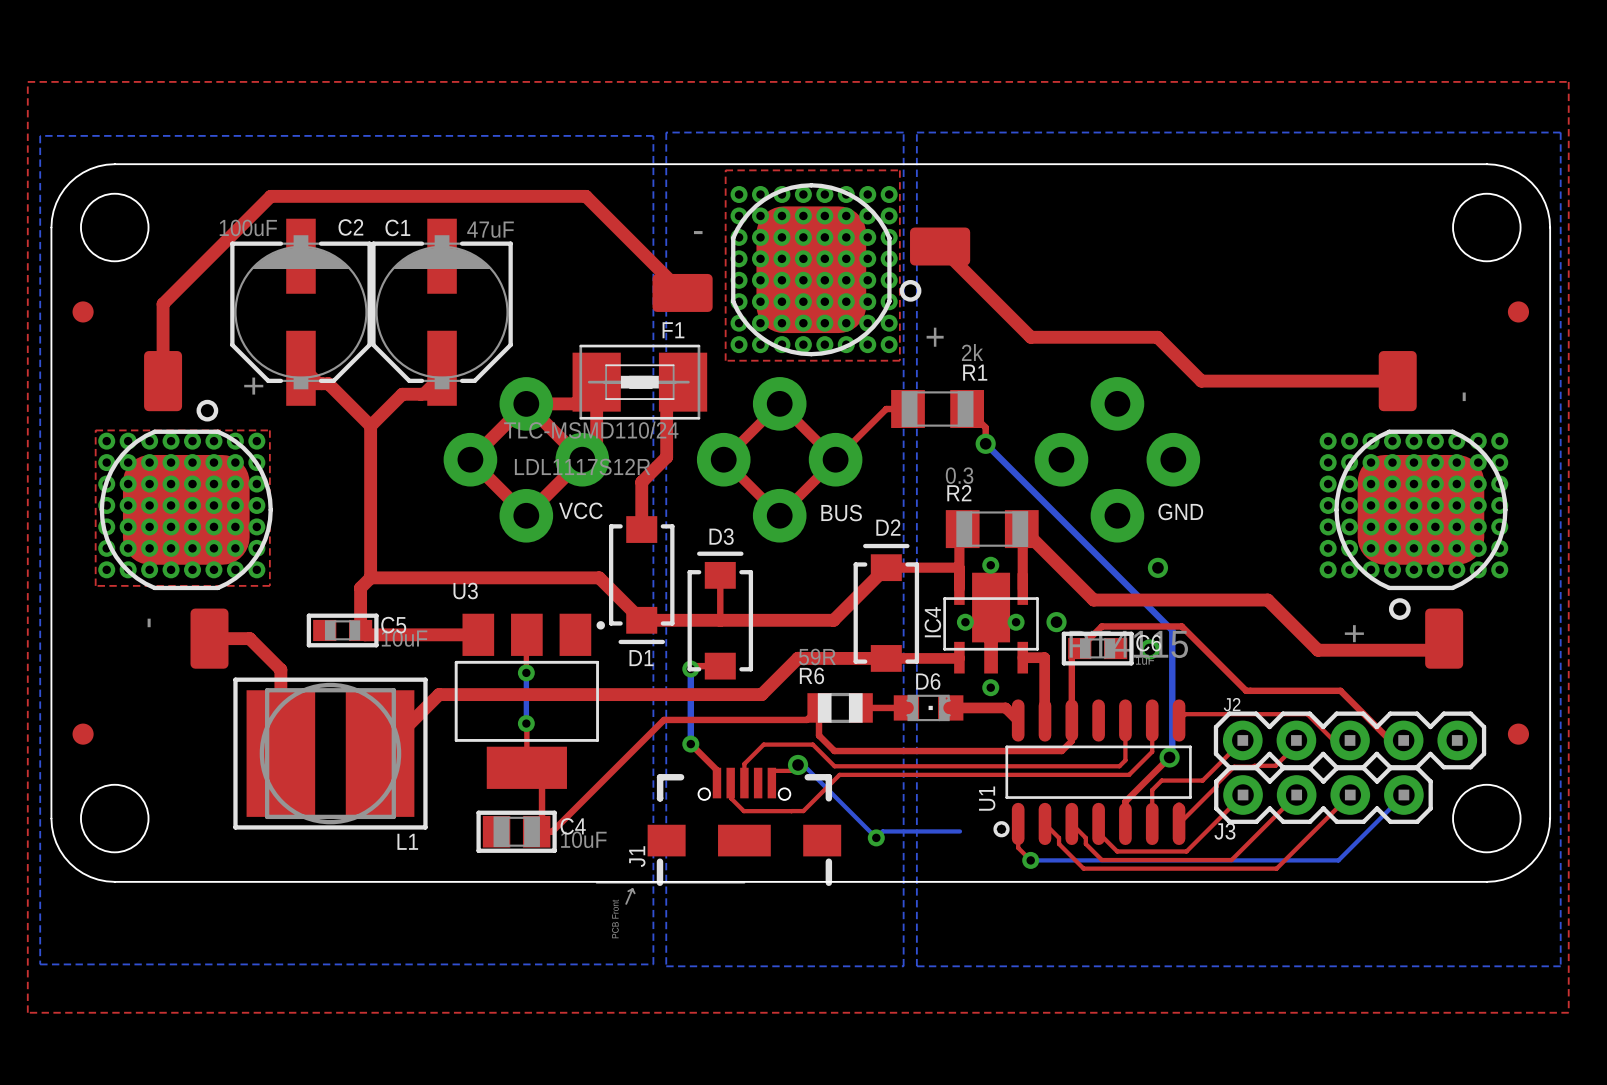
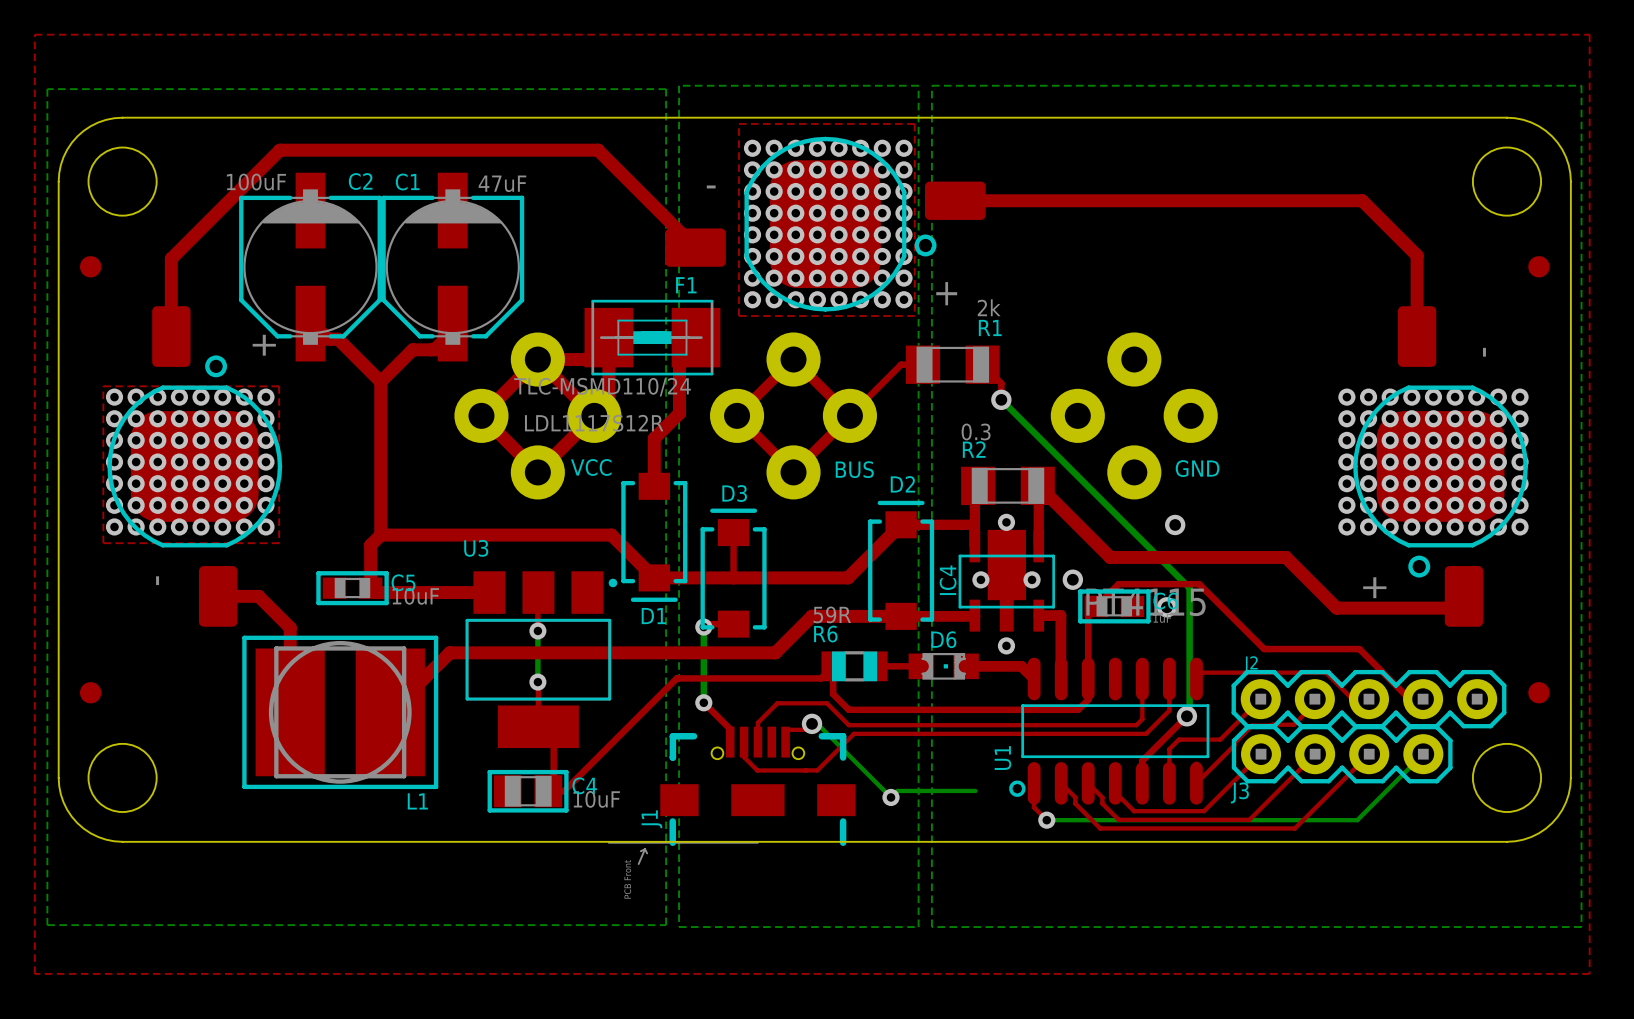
top track: (940, 246) (1030, 337) (1157, 337) (1201, 381) (1397, 381) -> (955, 200) (1362, 200) (1417, 255) (1417, 336)

